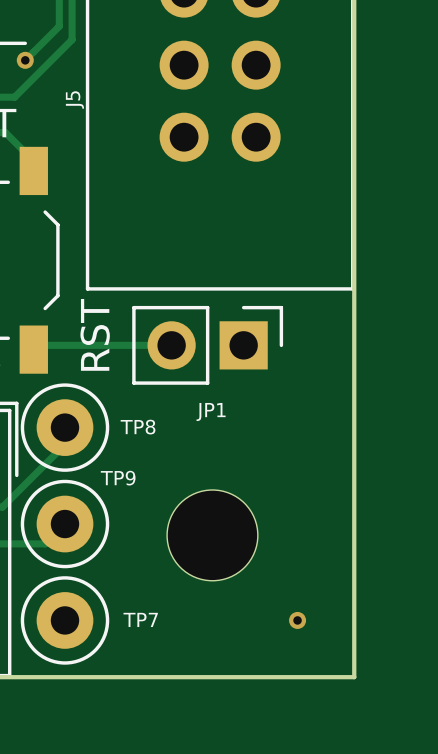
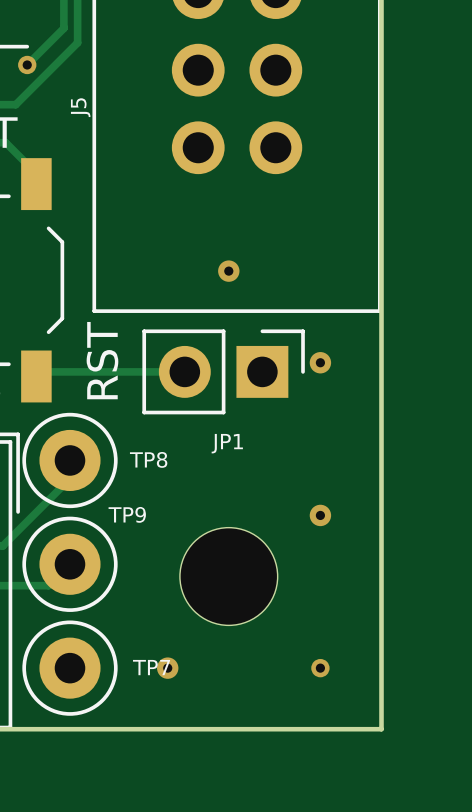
via: none -> (228, 271)
via: none -> (320, 362)
via: none -> (320, 515)
via: none -> (167, 668)

